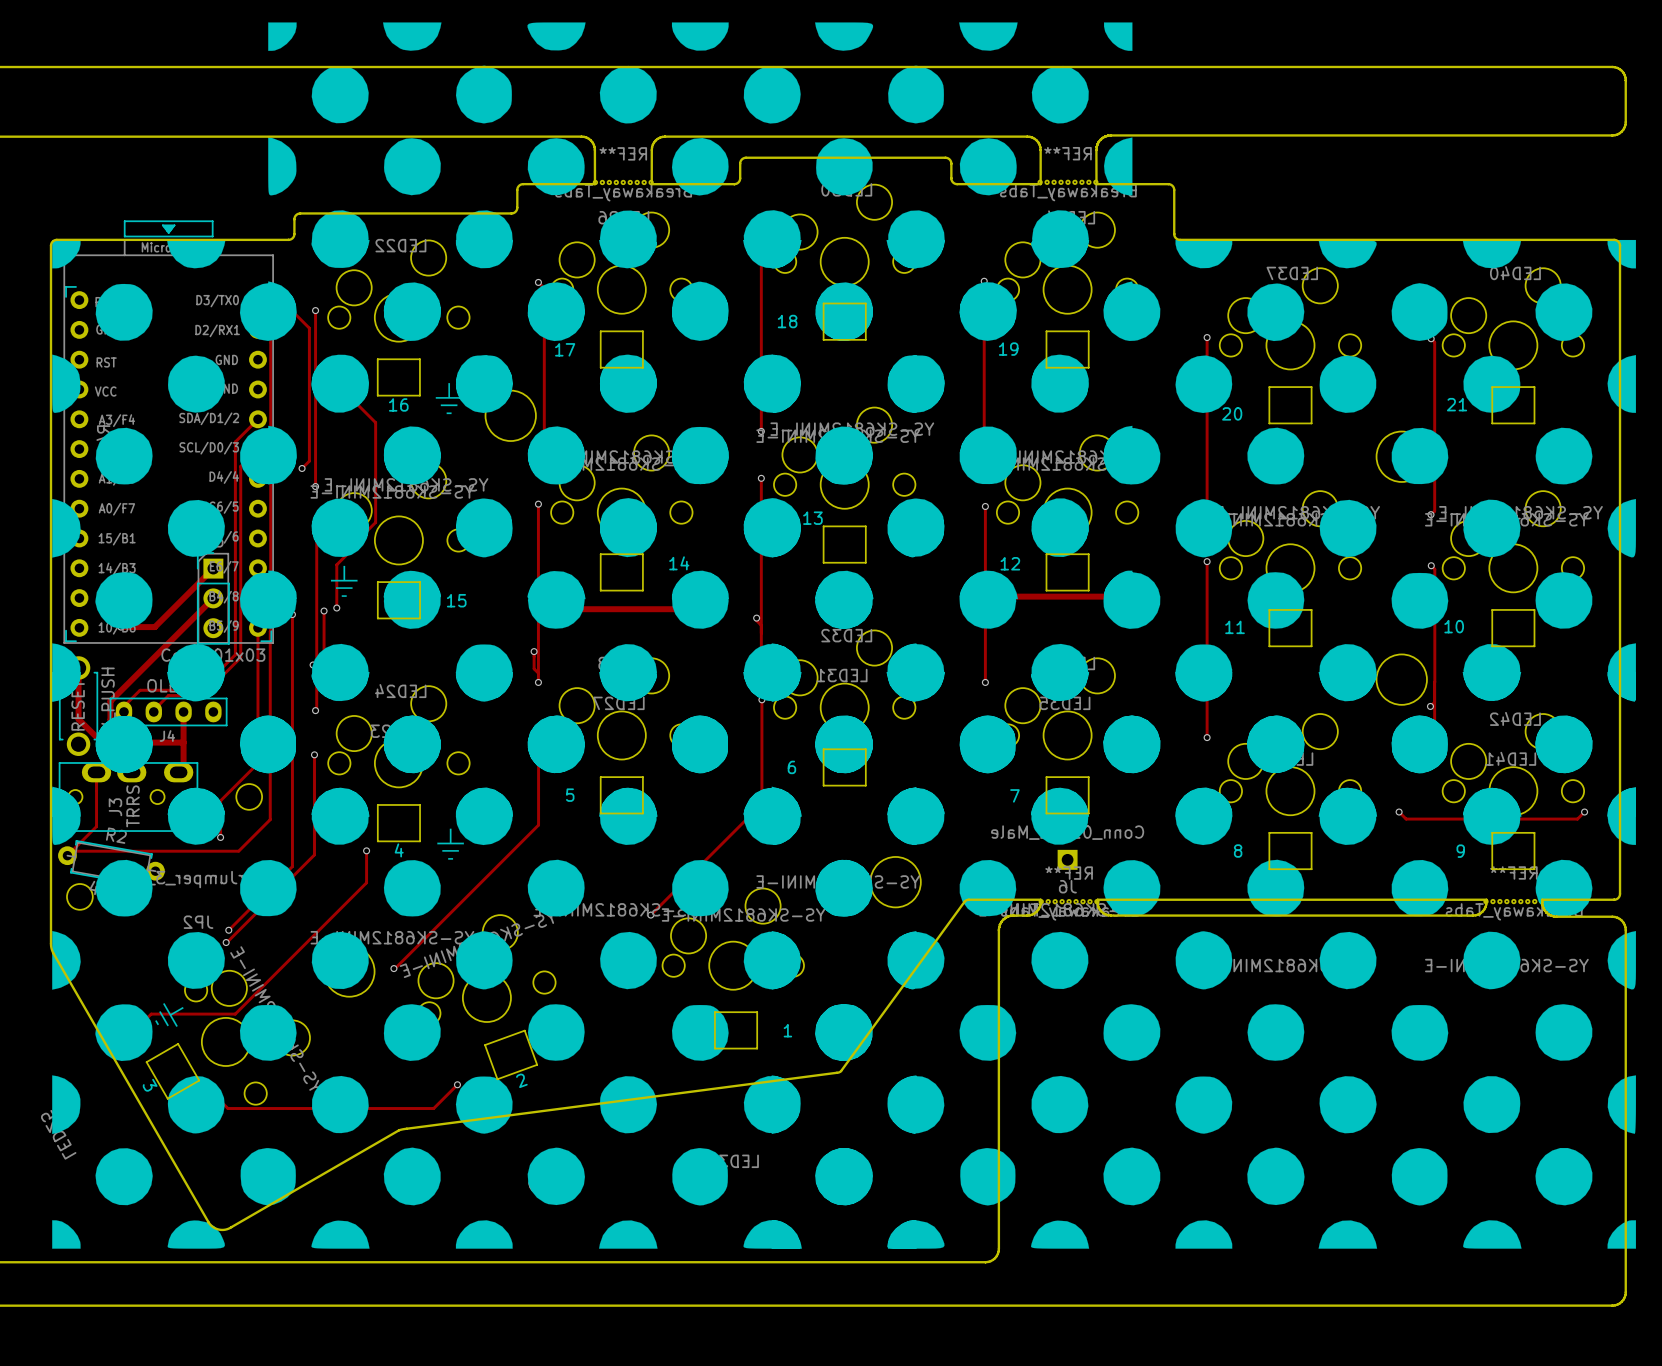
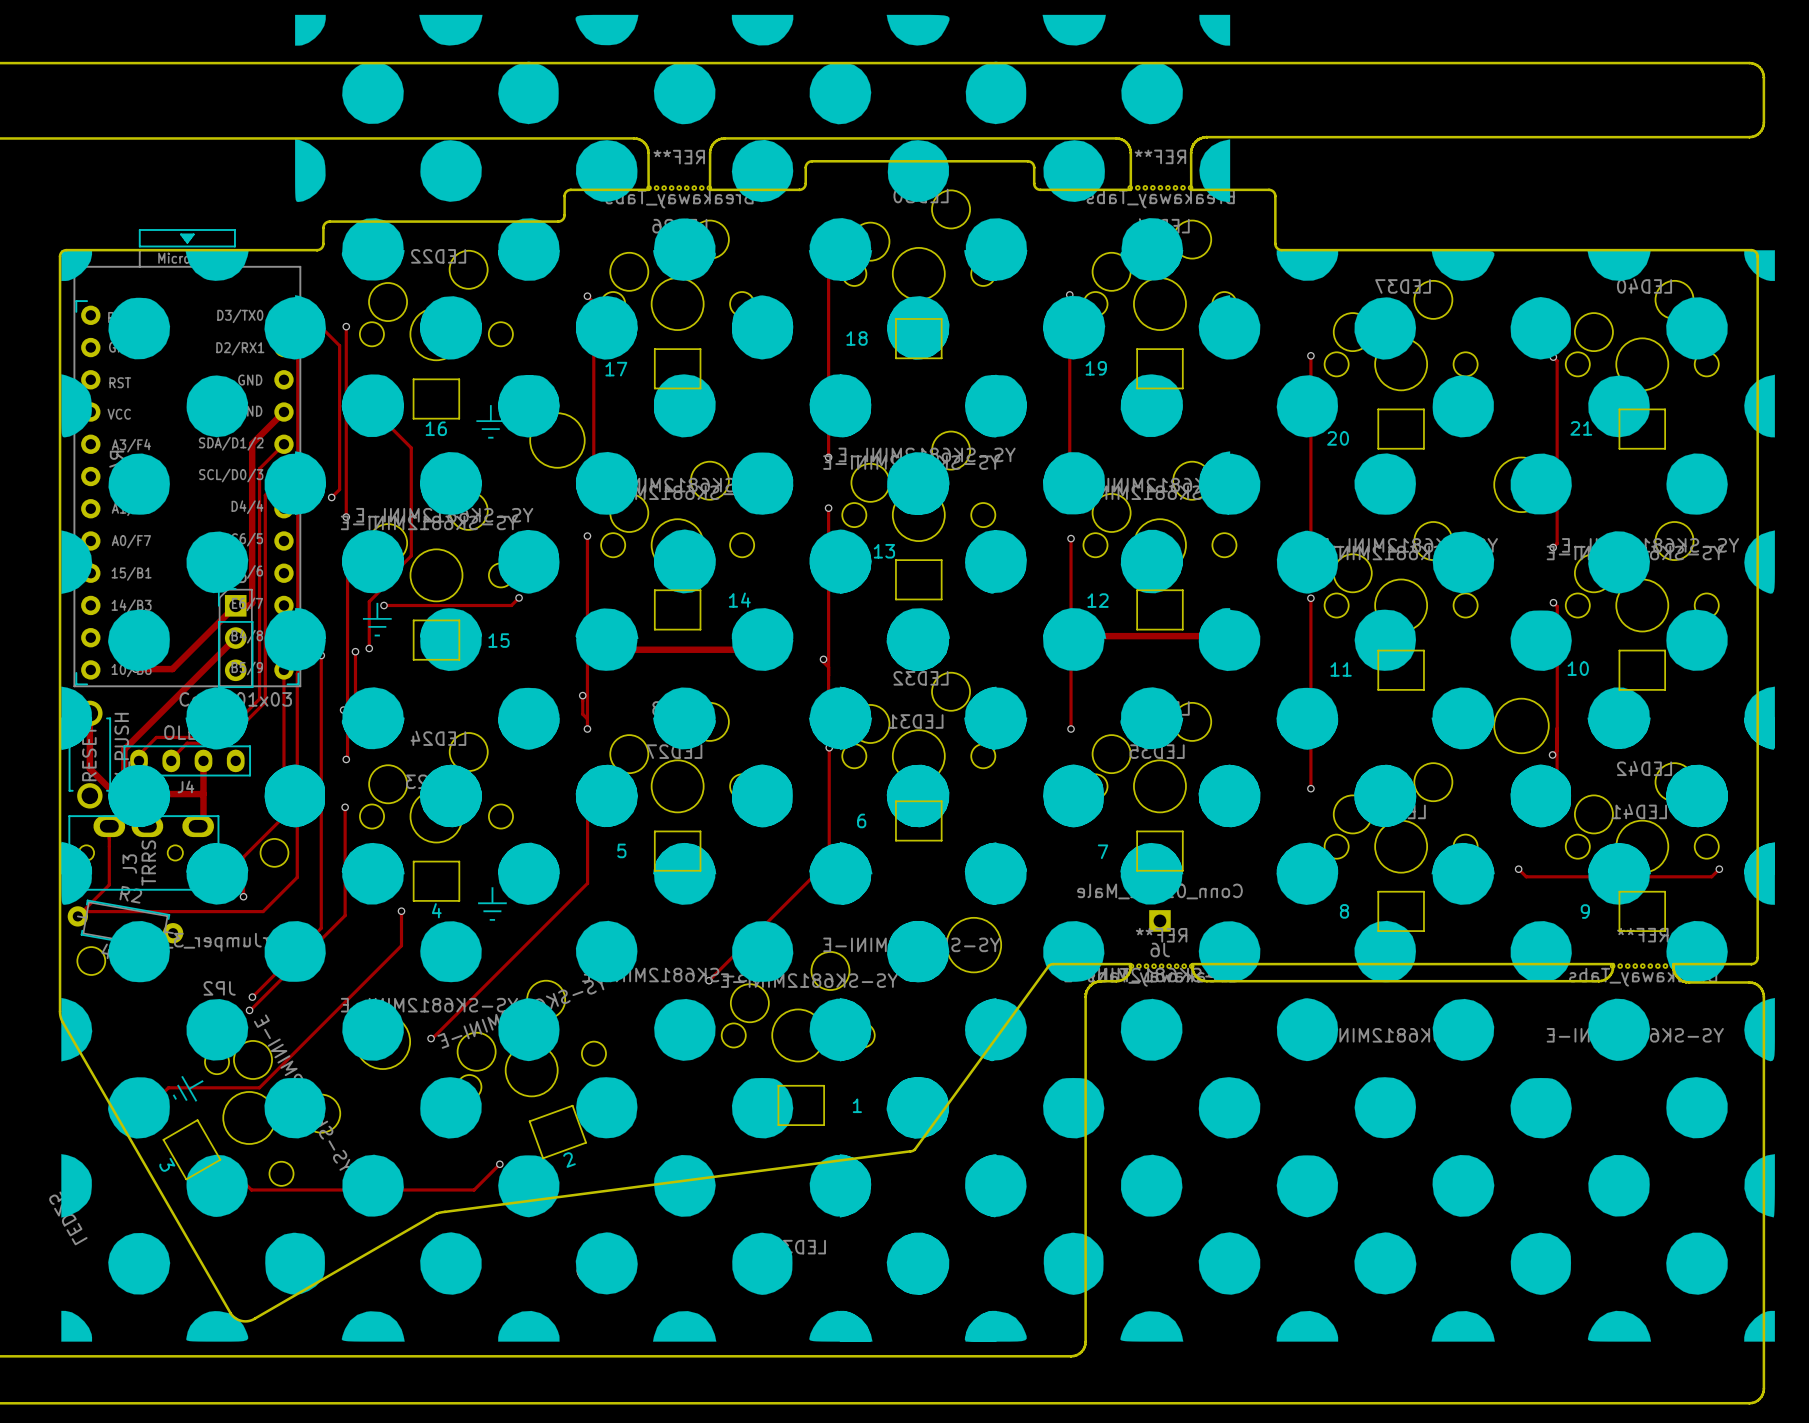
track: none -> (283, 412) (252, 443) (252, 603) (249, 605) (235, 605)
track: none -> (519, 597) (511, 605) (383, 605)
via: none -> (519, 597)
via: none -> (383, 605)

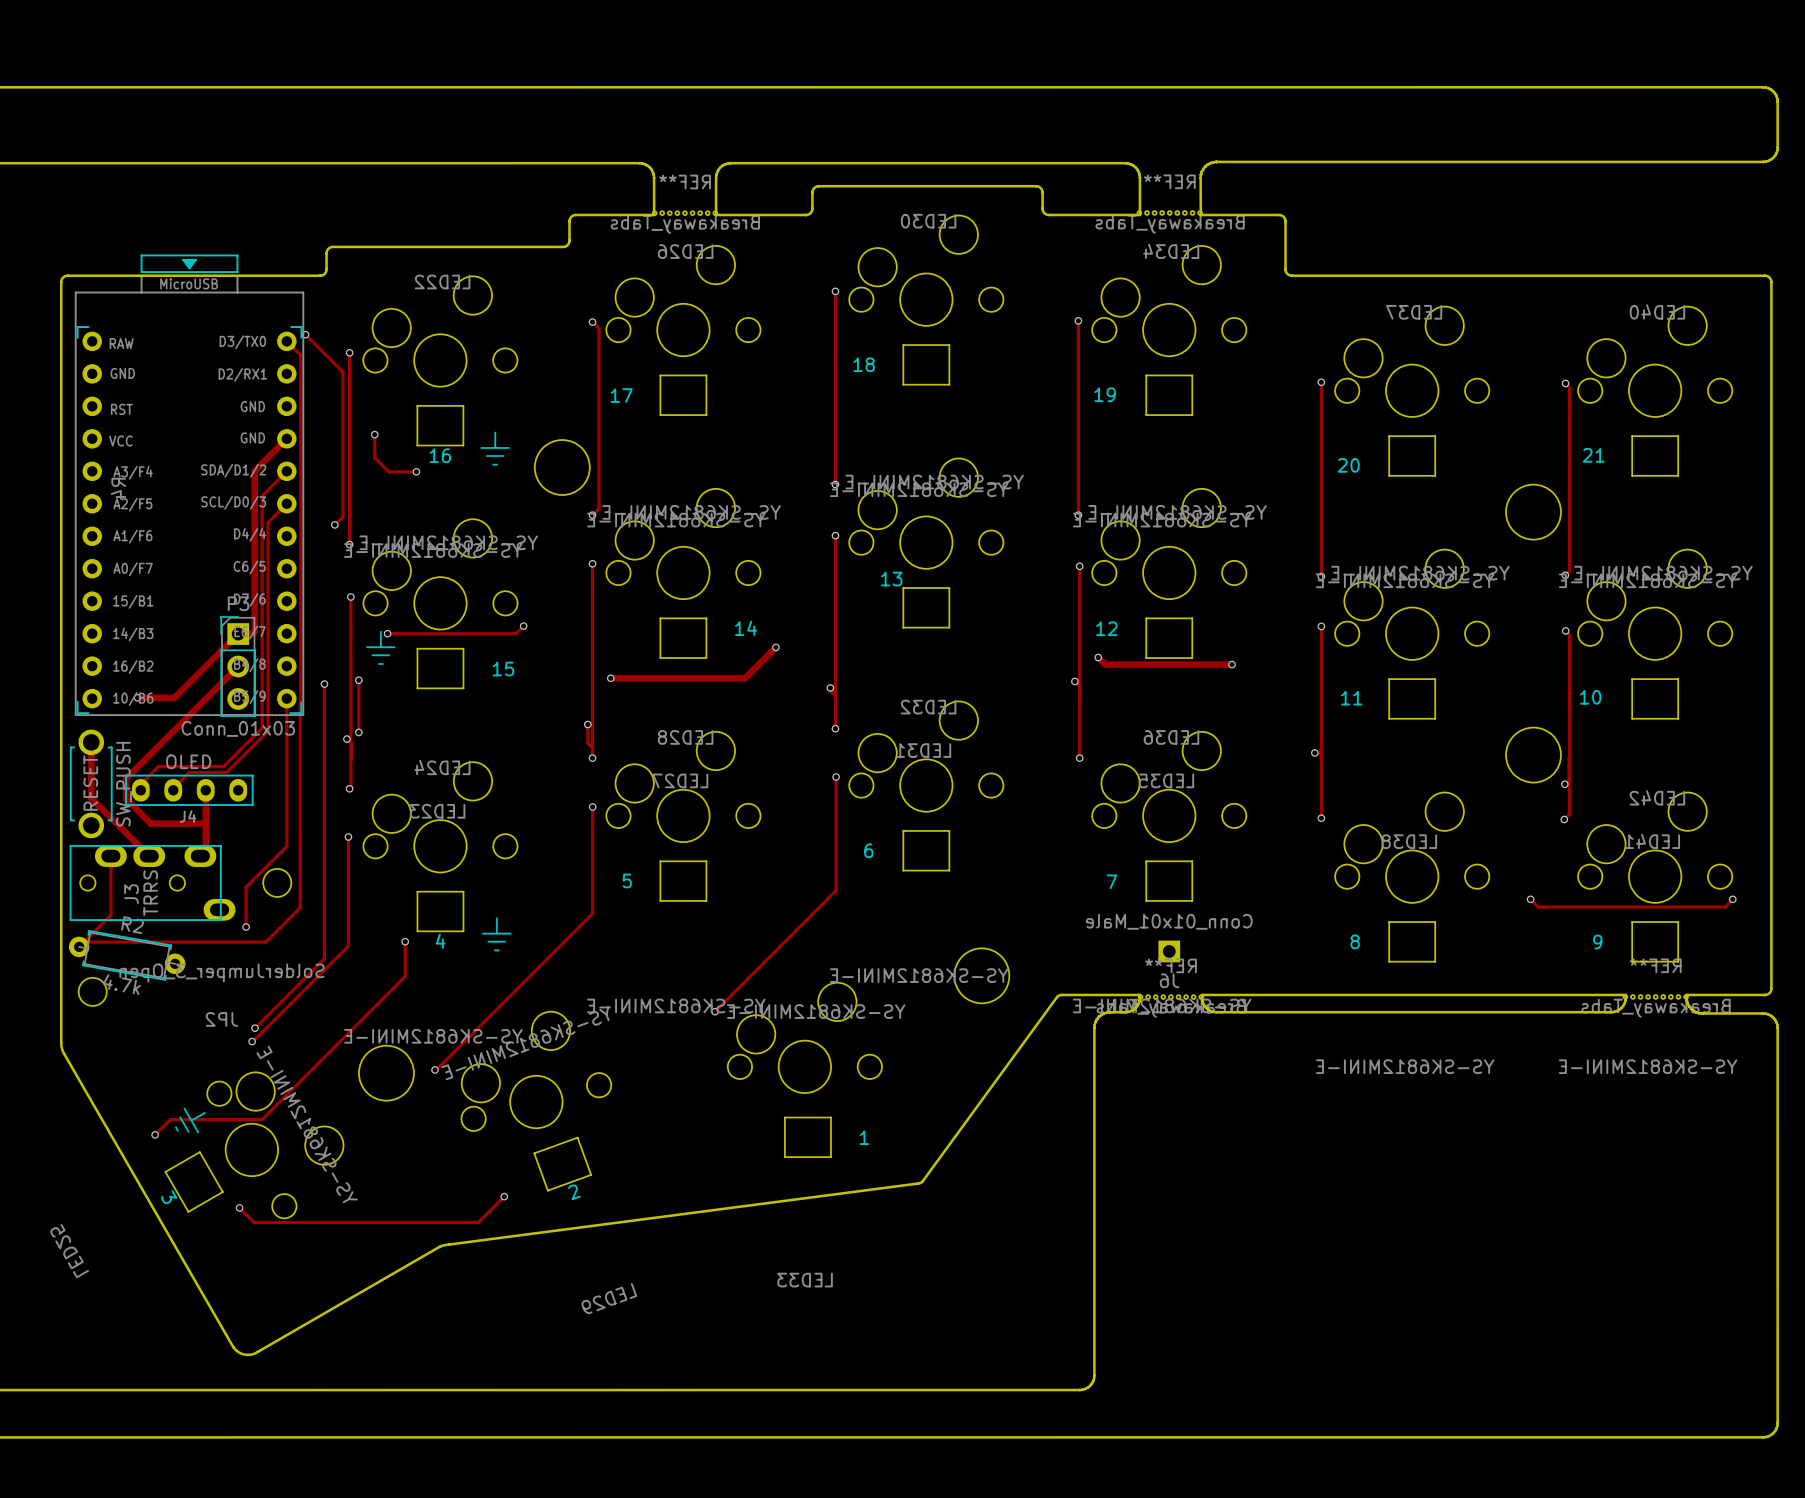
drawing: [61, 14, 1775, 1342] -> none
track: (371, 407) (411, 447) (411, 555) (369, 601) (369, 648) -> (374, 434) (374, 457) (388, 471) (416, 471)
via: none -> (416, 471)
via: (369, 648) -> none

